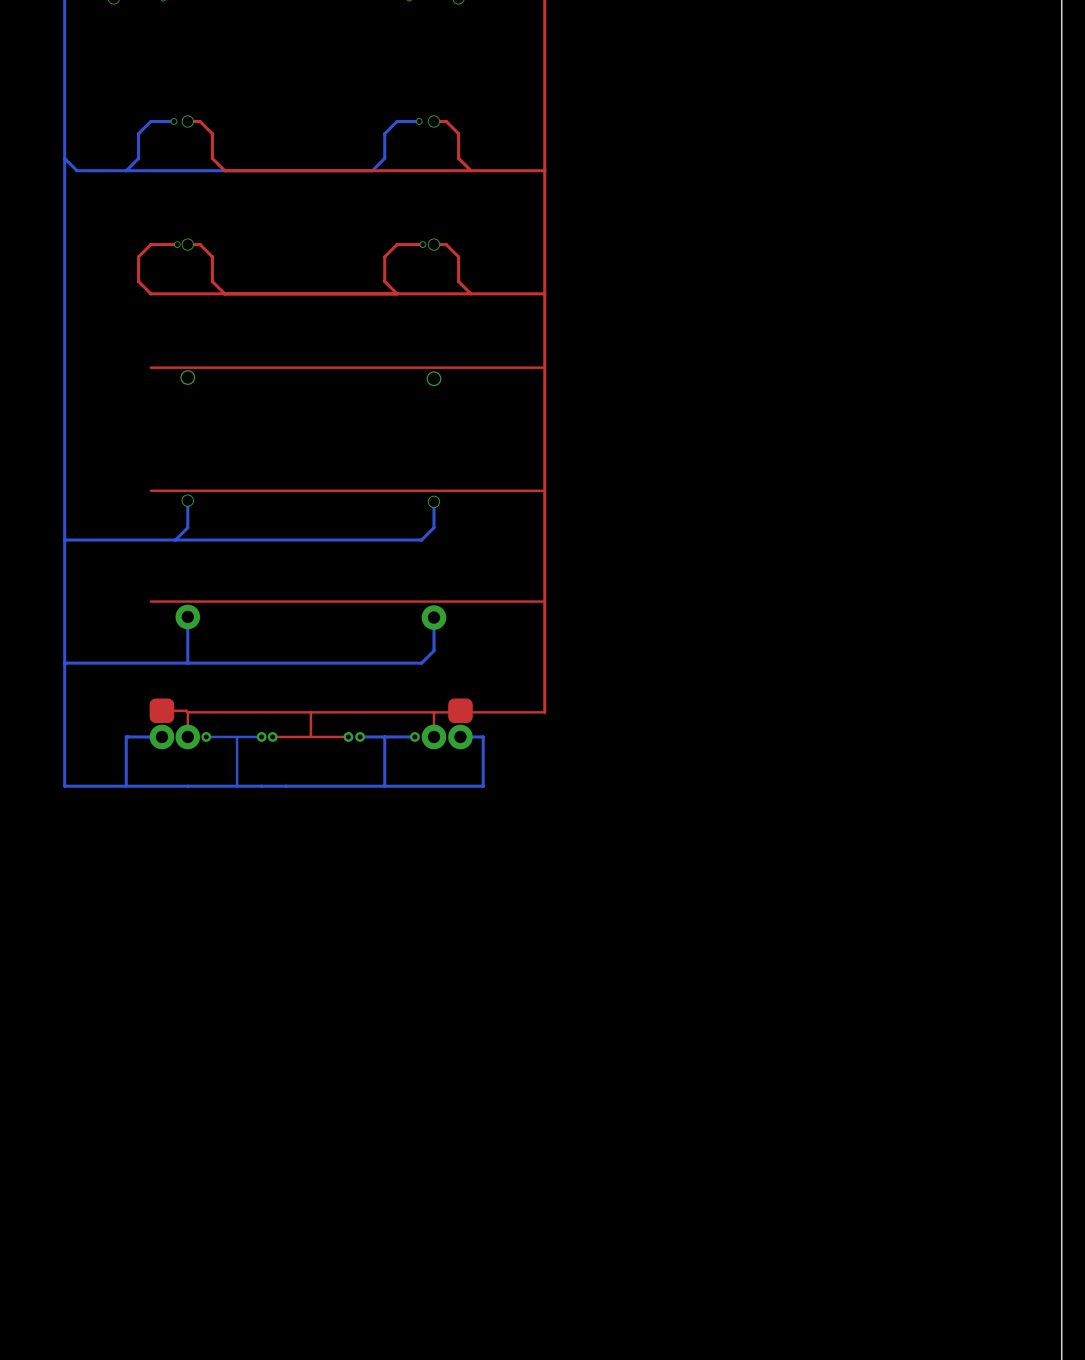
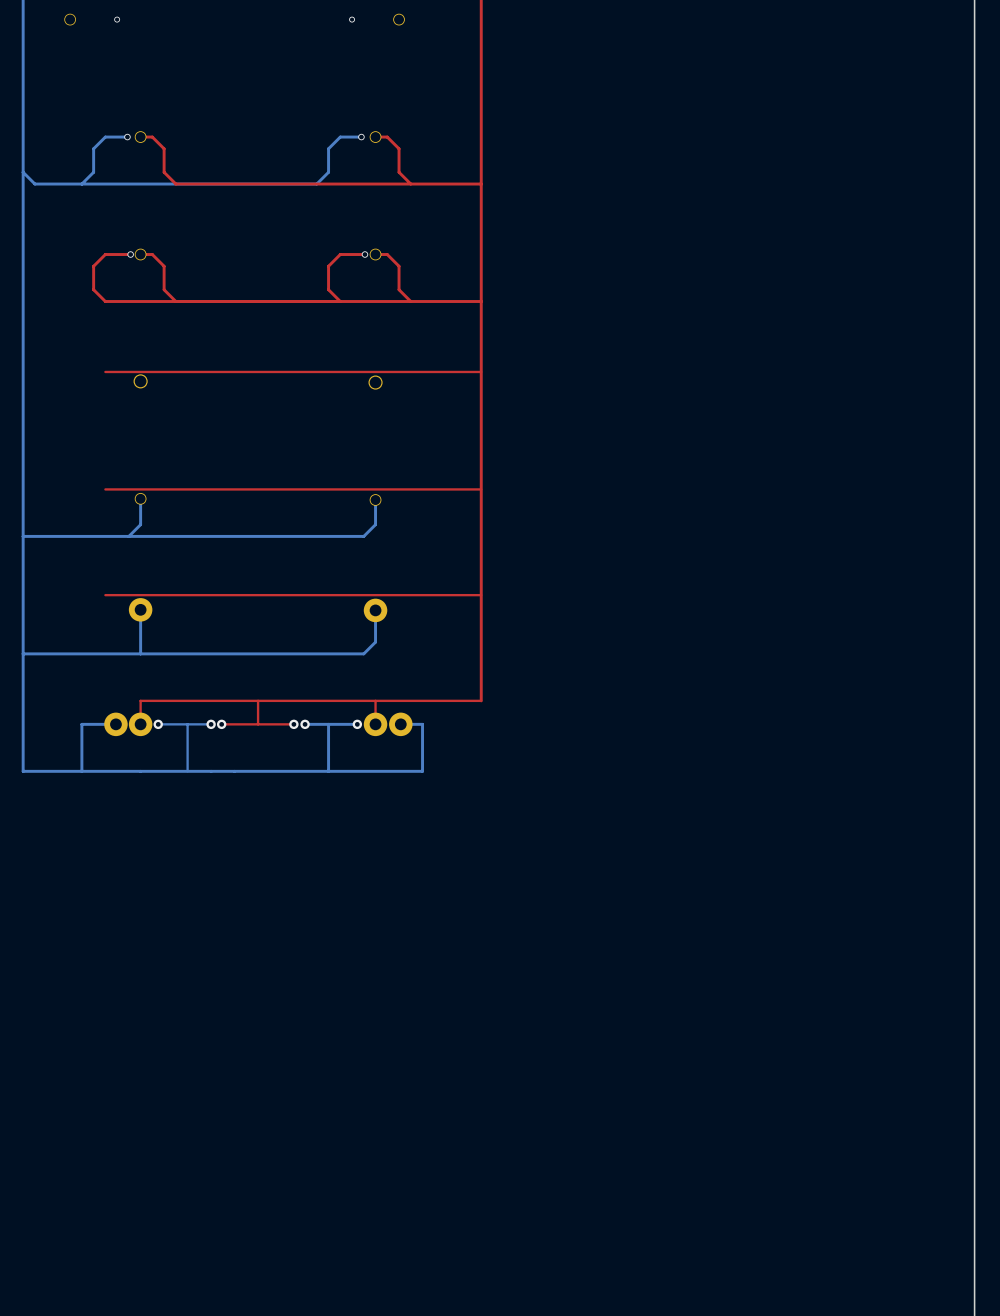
top track: (161, 710) (187, 712) -> none
part: (161, 710) -> none
part: (460, 710) -> none

